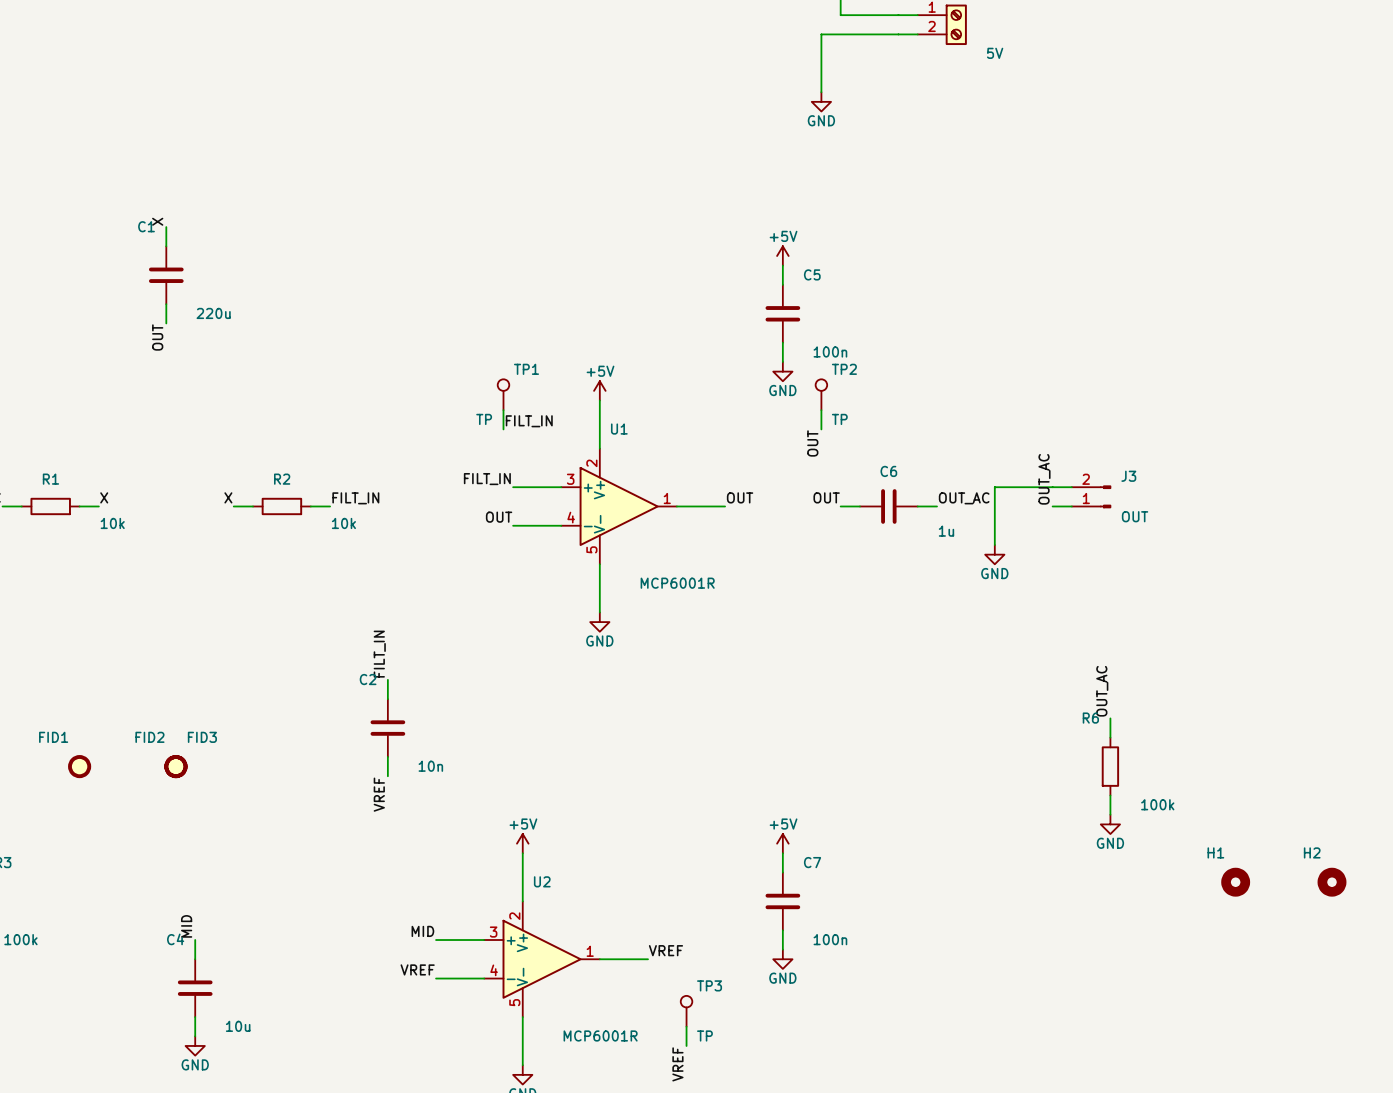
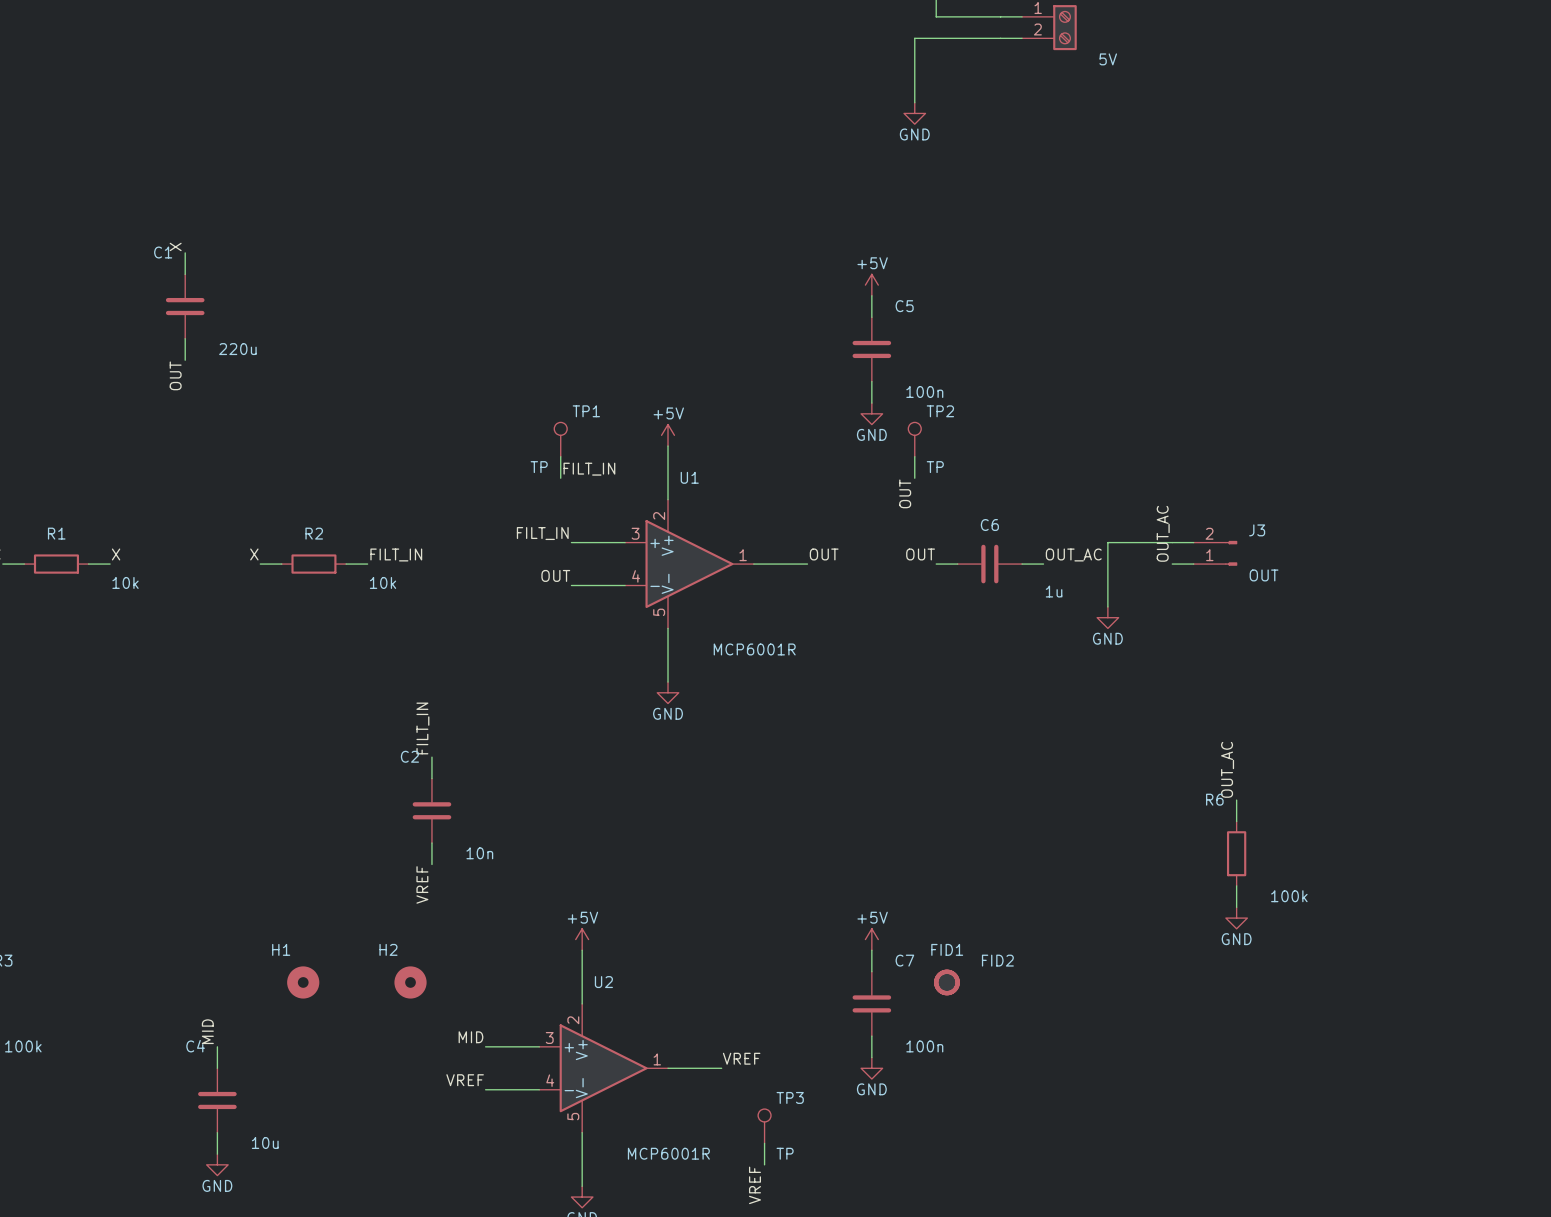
FID1 name position: FID1 (53, 737) -> FID1 (947, 949)
FID2 name position: FID2 (149, 737) -> FID2 (997, 960)
FID1 position: (79, 766) -> (946, 982)
FID2 position: (175, 766) -> (946, 982)
FID3: (175, 766) -> none
H1 position: (1235, 882) -> (303, 982)
H2 position: (1332, 882) -> (410, 982)

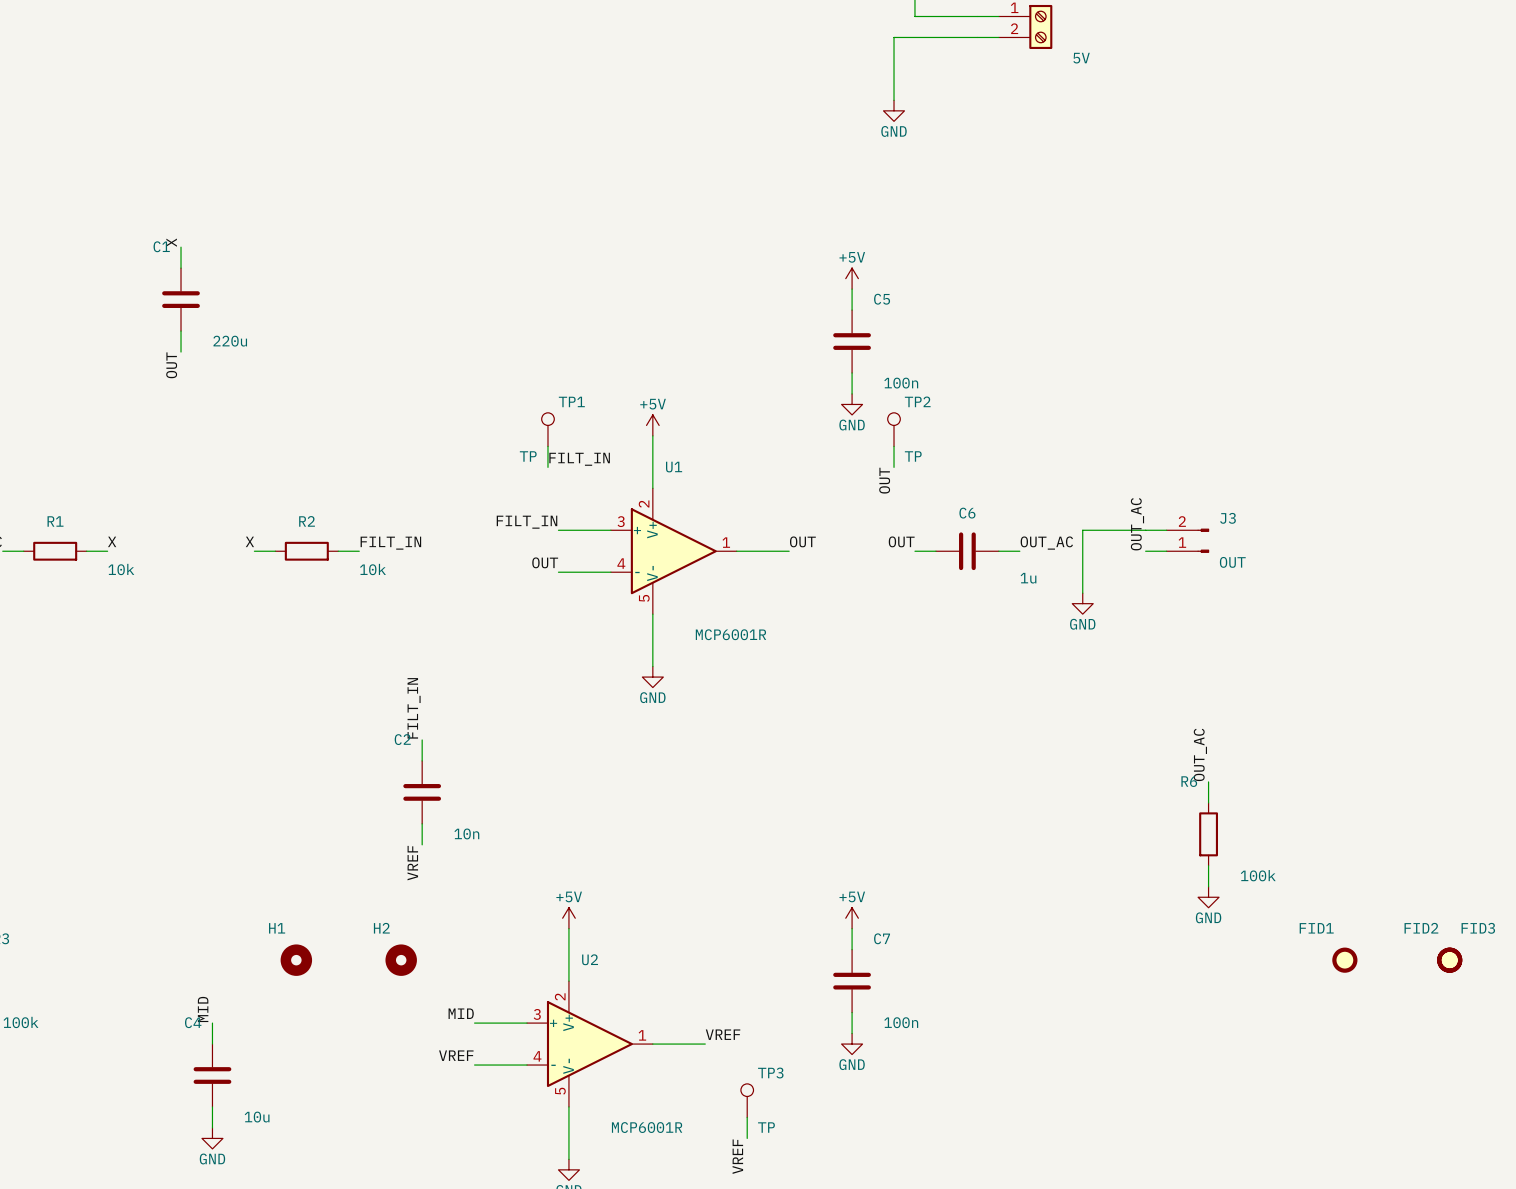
FID1 name position: FID1 (947, 949) -> FID1 (1316, 928)
FID2 name position: FID2 (997, 960) -> FID2 (1421, 928)
FID1 position: (946, 982) -> (1344, 960)
FID2 position: (946, 982) -> (1449, 960)
FID3: none -> (1449, 960)

